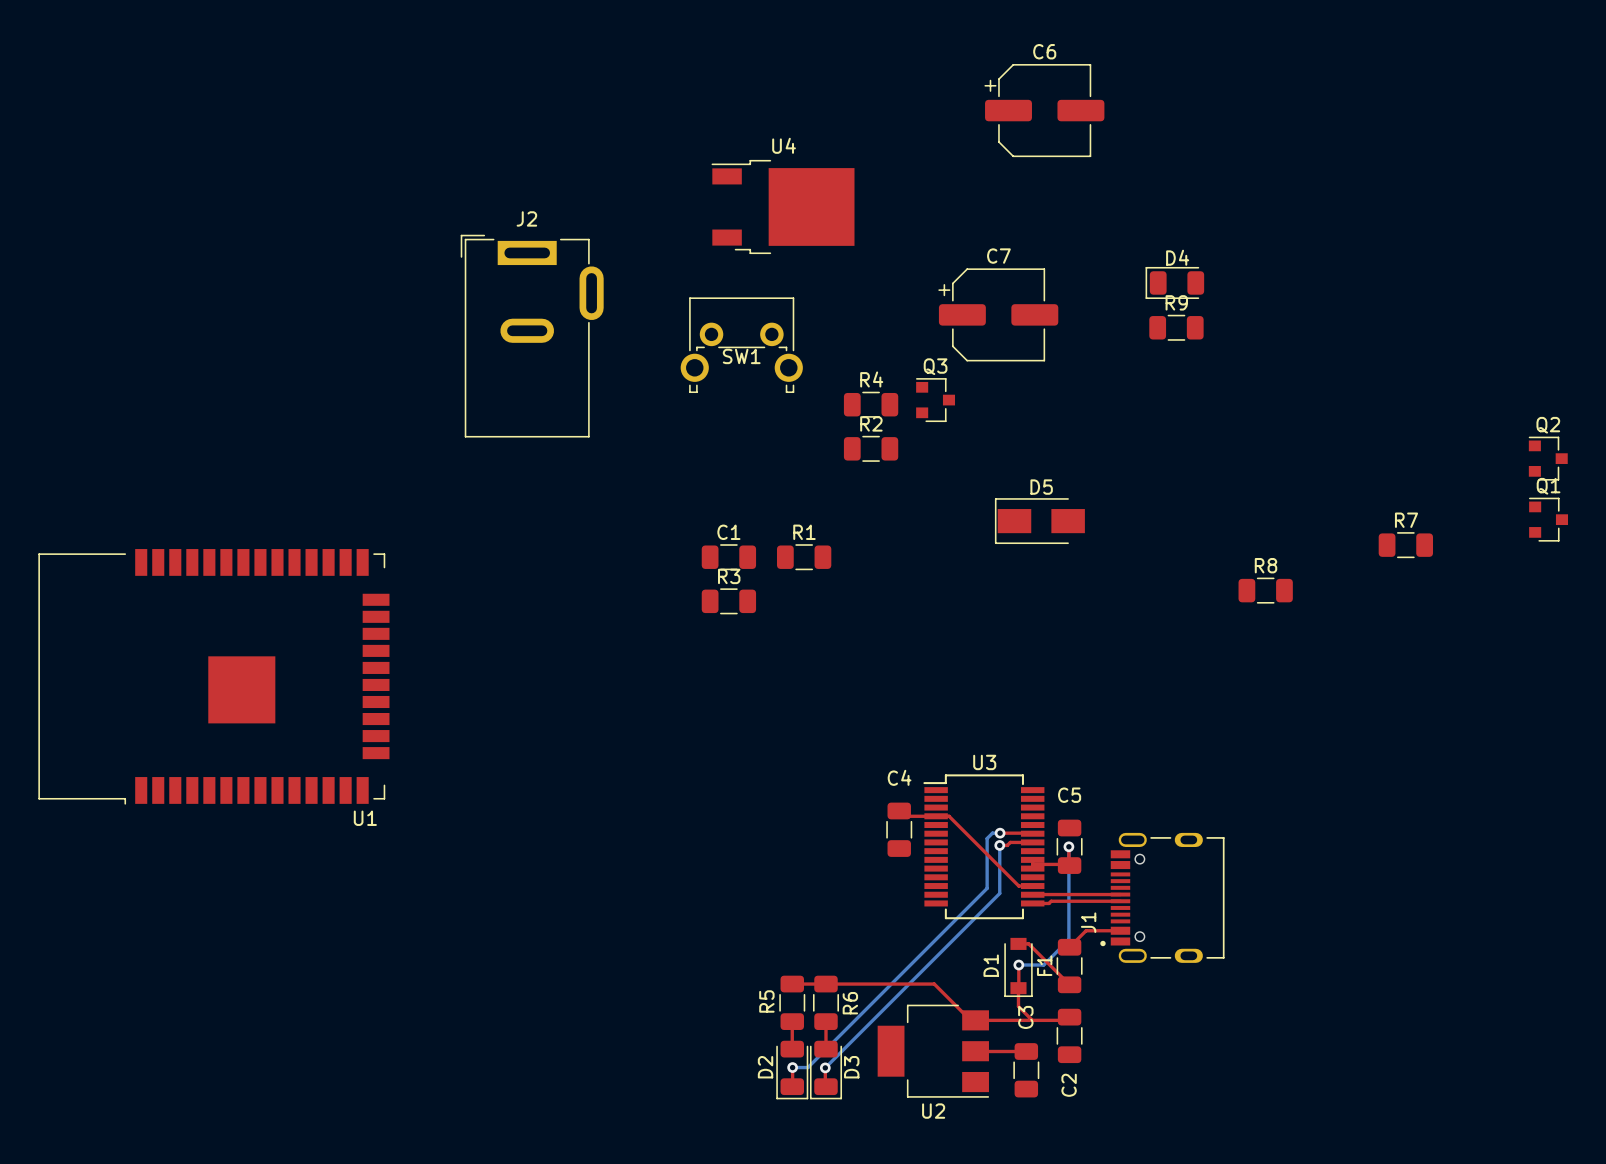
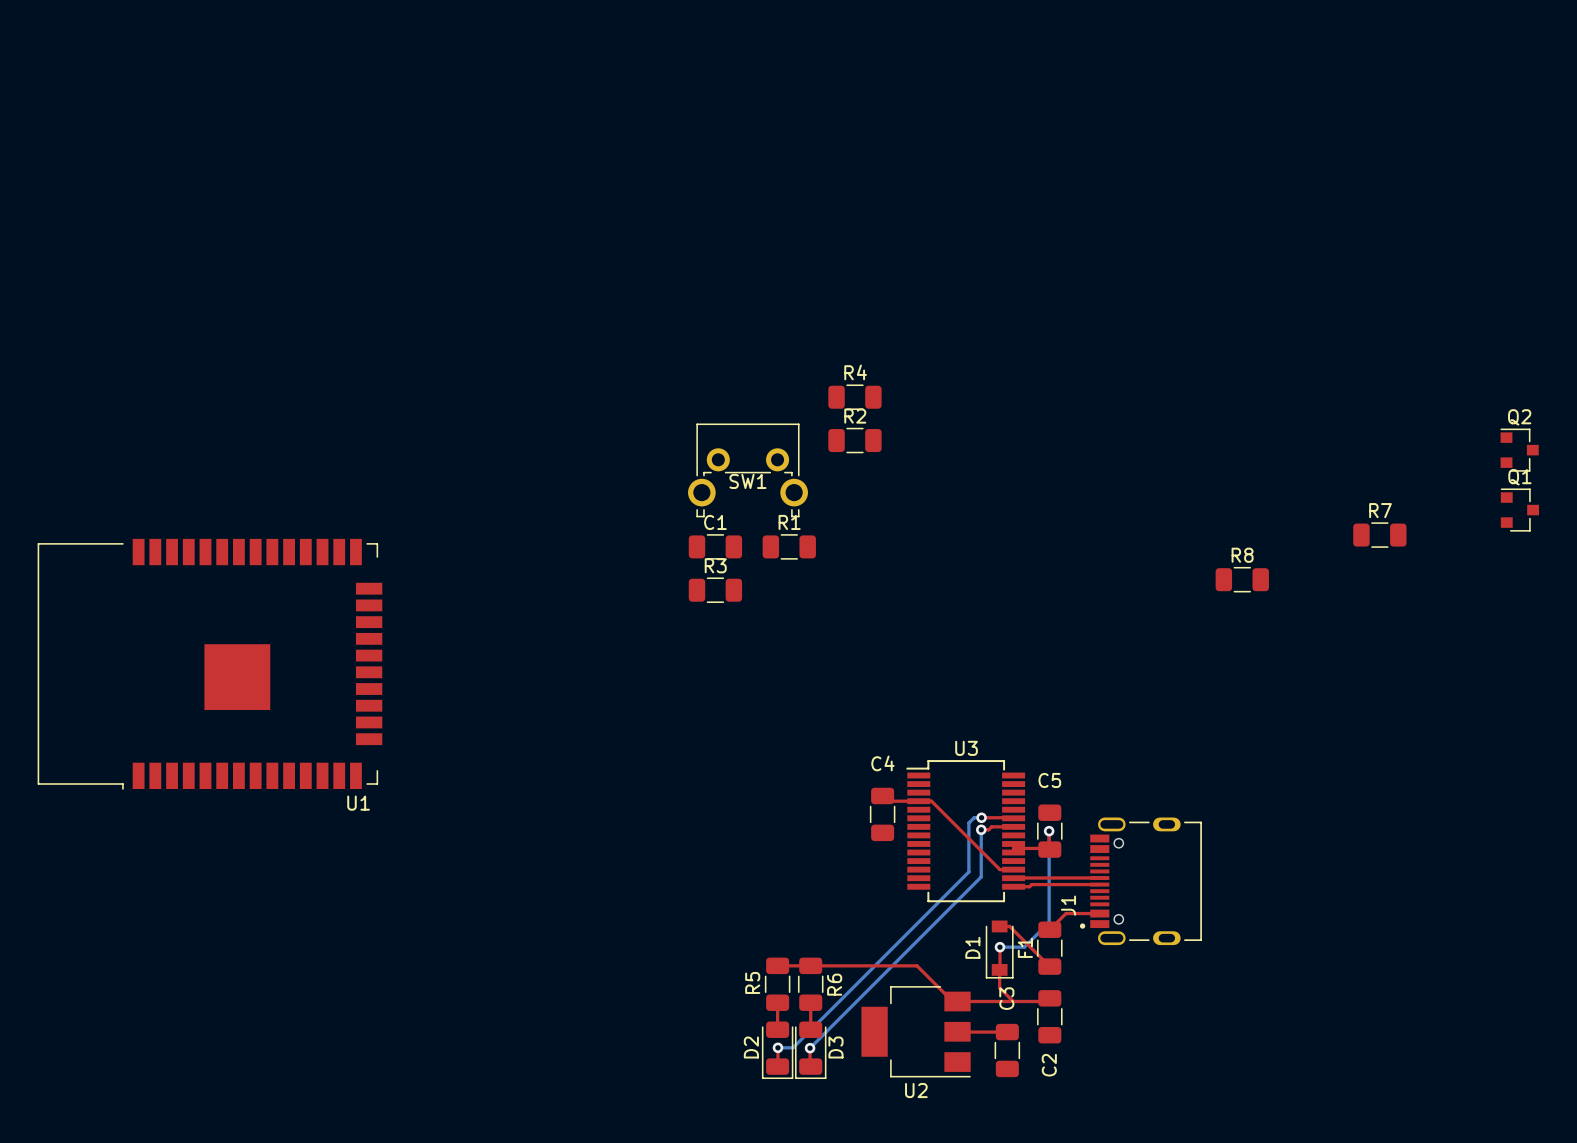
C6: (1044, 110) -> none
U4: (783, 206) -> none
D4: (1174, 282) -> none
C7: (998, 314) -> none
R9: (1176, 327) -> none
J2: (532, 336) -> none
SW1 position: (741, 345) -> (748, 470)
Q3: (935, 400) -> none
D5: (1039, 521) -> none

